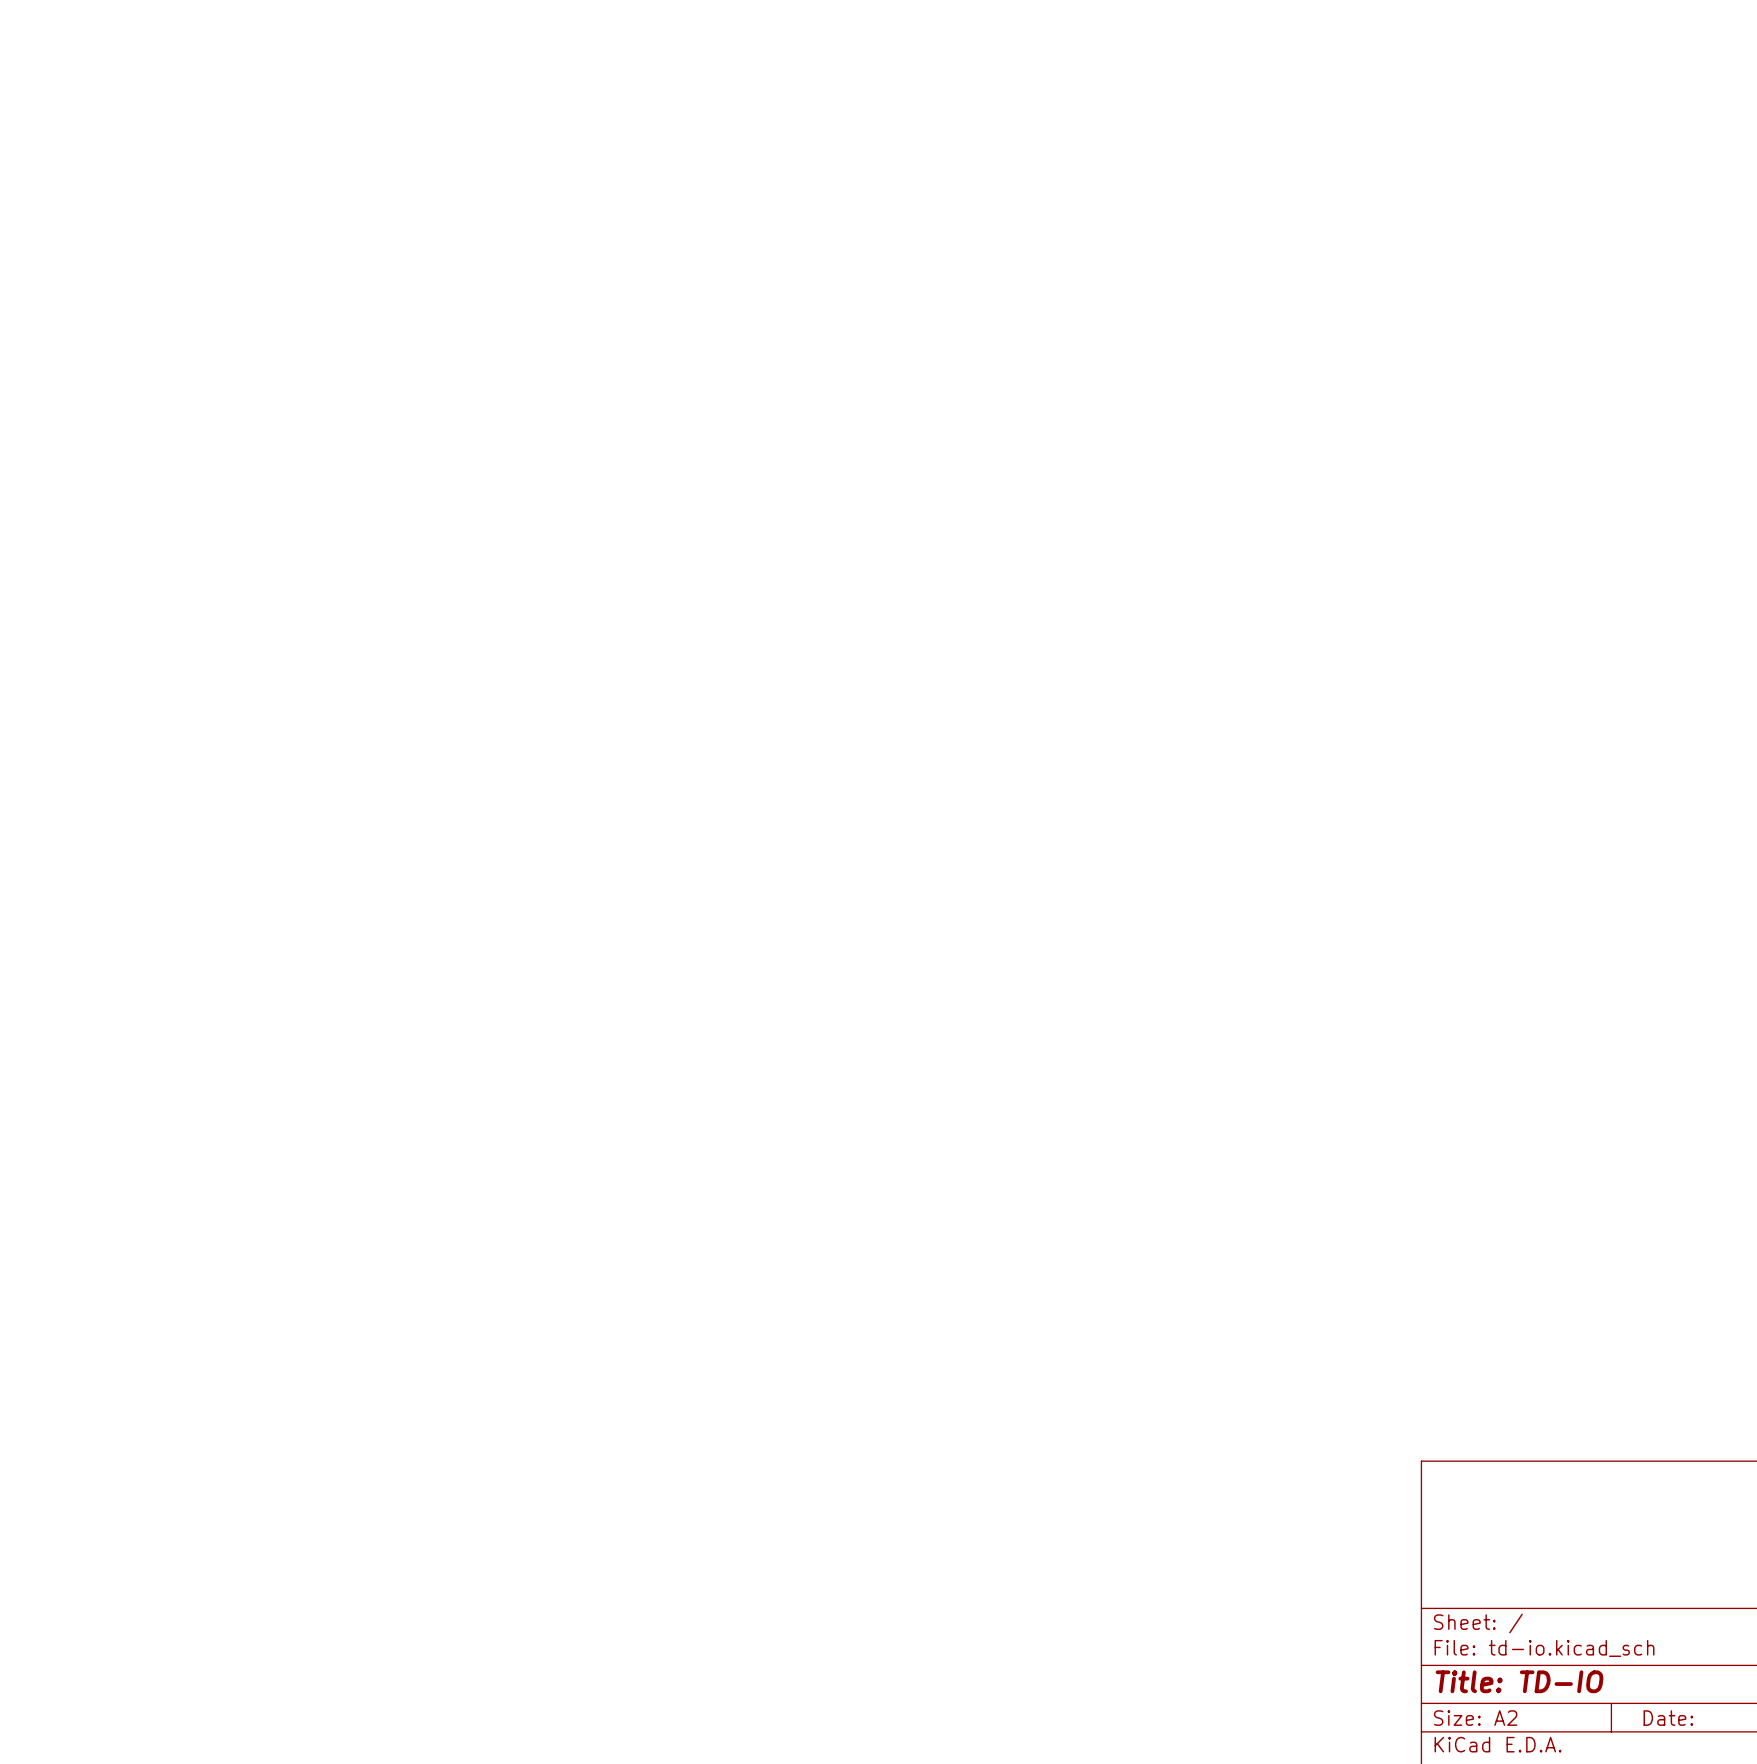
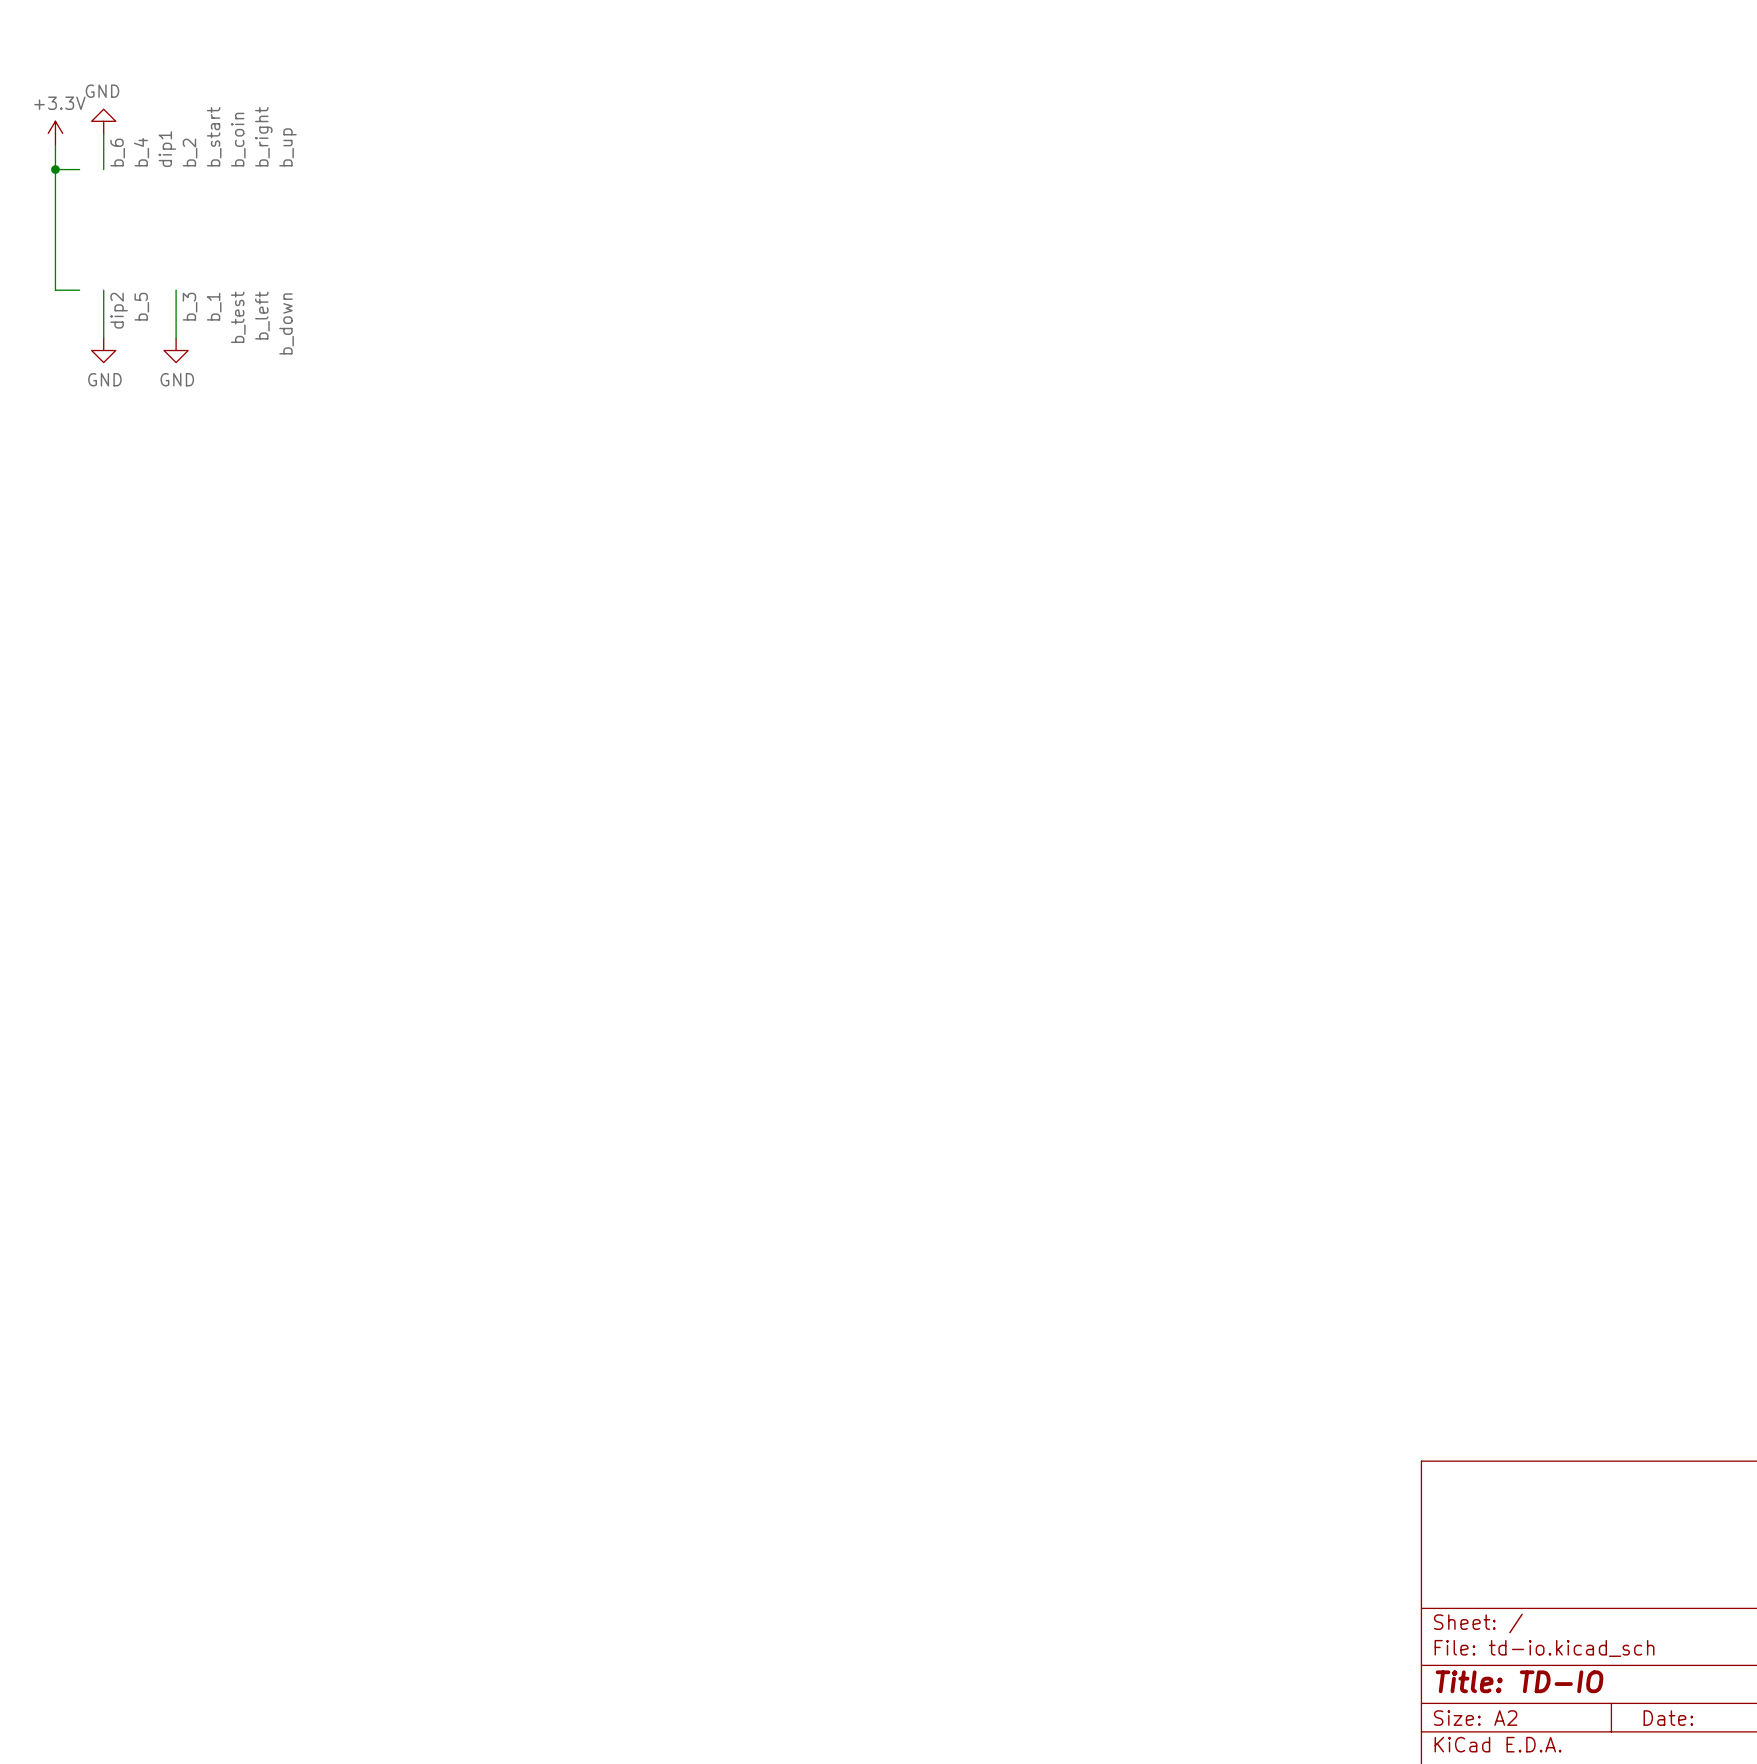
power symbol: none -> GND (103, 121)
power symbol: none -> +3.3V (55, 133)
wire: none -> (103, 133) (103, 169)
label: none -> b_start (214, 136)
label: none -> b_right (263, 136)
label: none -> b_coin (238, 139)
wire: none -> (55, 145) (55, 290) (79, 290)
label: none -> b_up (287, 147)
label: none -> dip1 (167, 149)
label: none -> b_6 (117, 152)
label: none -> b_4 (141, 152)
label: none -> b_2 (190, 152)
wire: none -> (55, 169) (79, 169)
junction: none -> (55, 169)
wire: none -> (103, 290) (103, 338)
wire: none -> (176, 290) (176, 338)
label: none -> b_5 (141, 306)
label: none -> b_3 (190, 306)
label: none -> b_1 (214, 306)
label: none -> dip2 (119, 310)
label: none -> b_left (262, 315)
label: none -> b_test (238, 317)
label: none -> b_down (286, 323)
power symbol: none -> GND (103, 350)
power symbol: none -> GND (176, 350)

